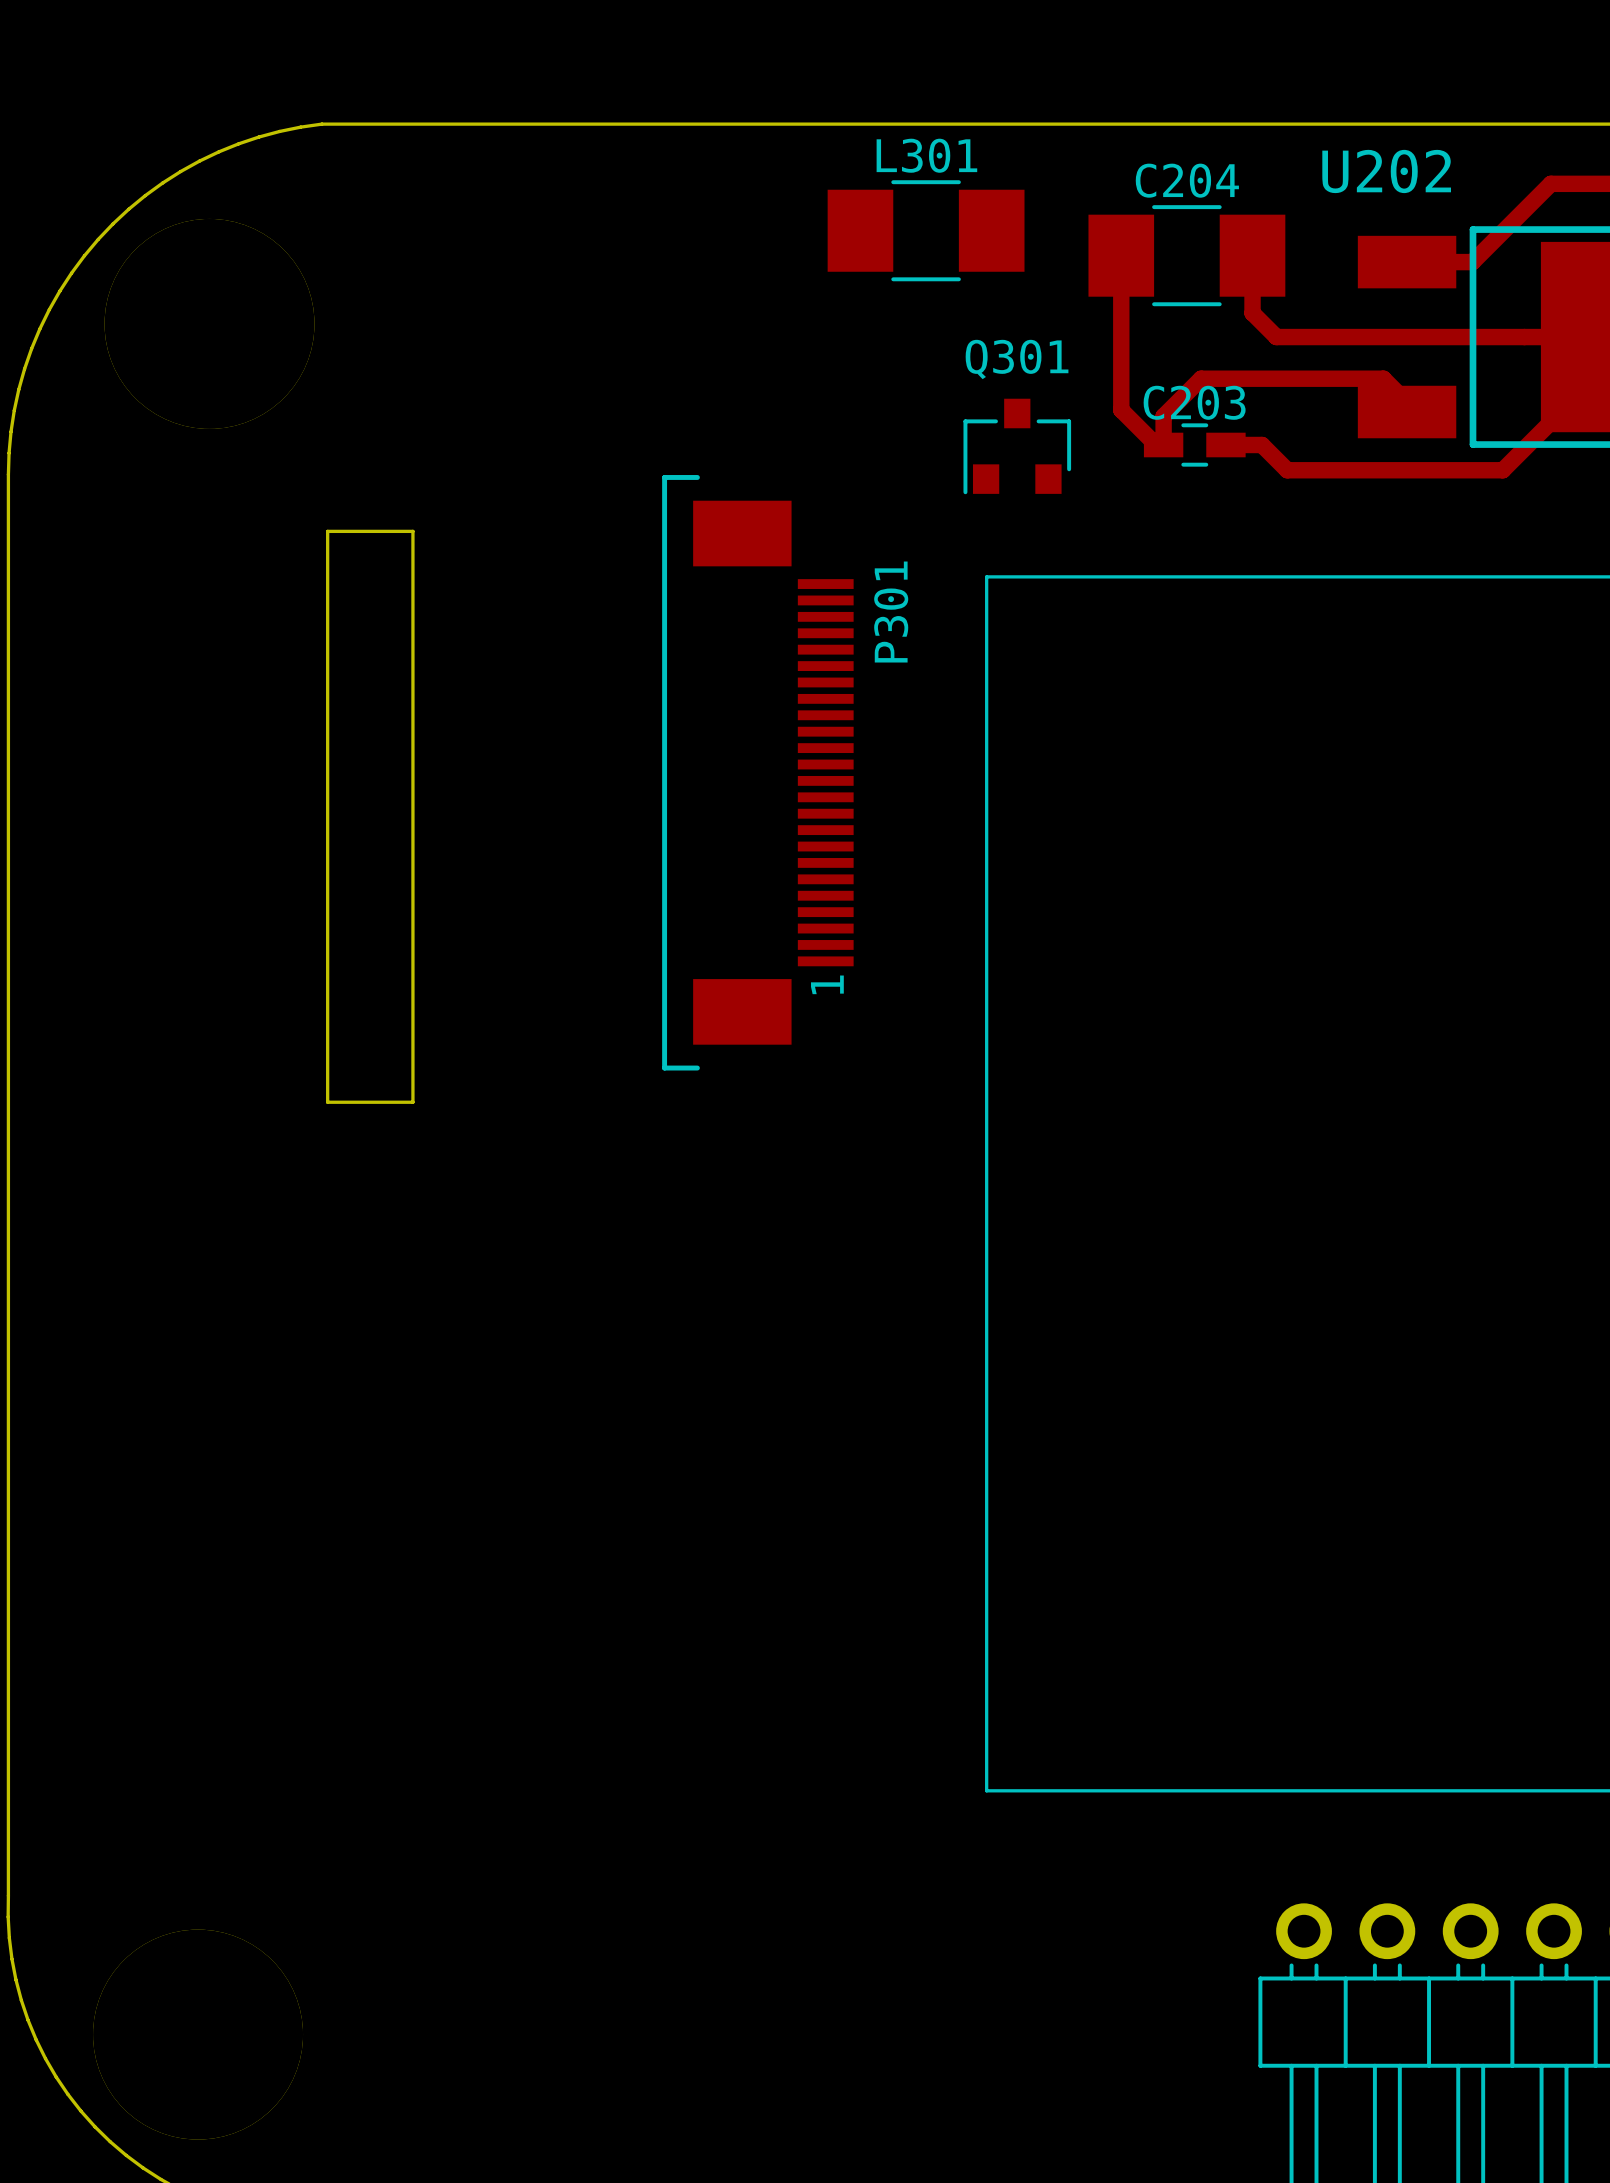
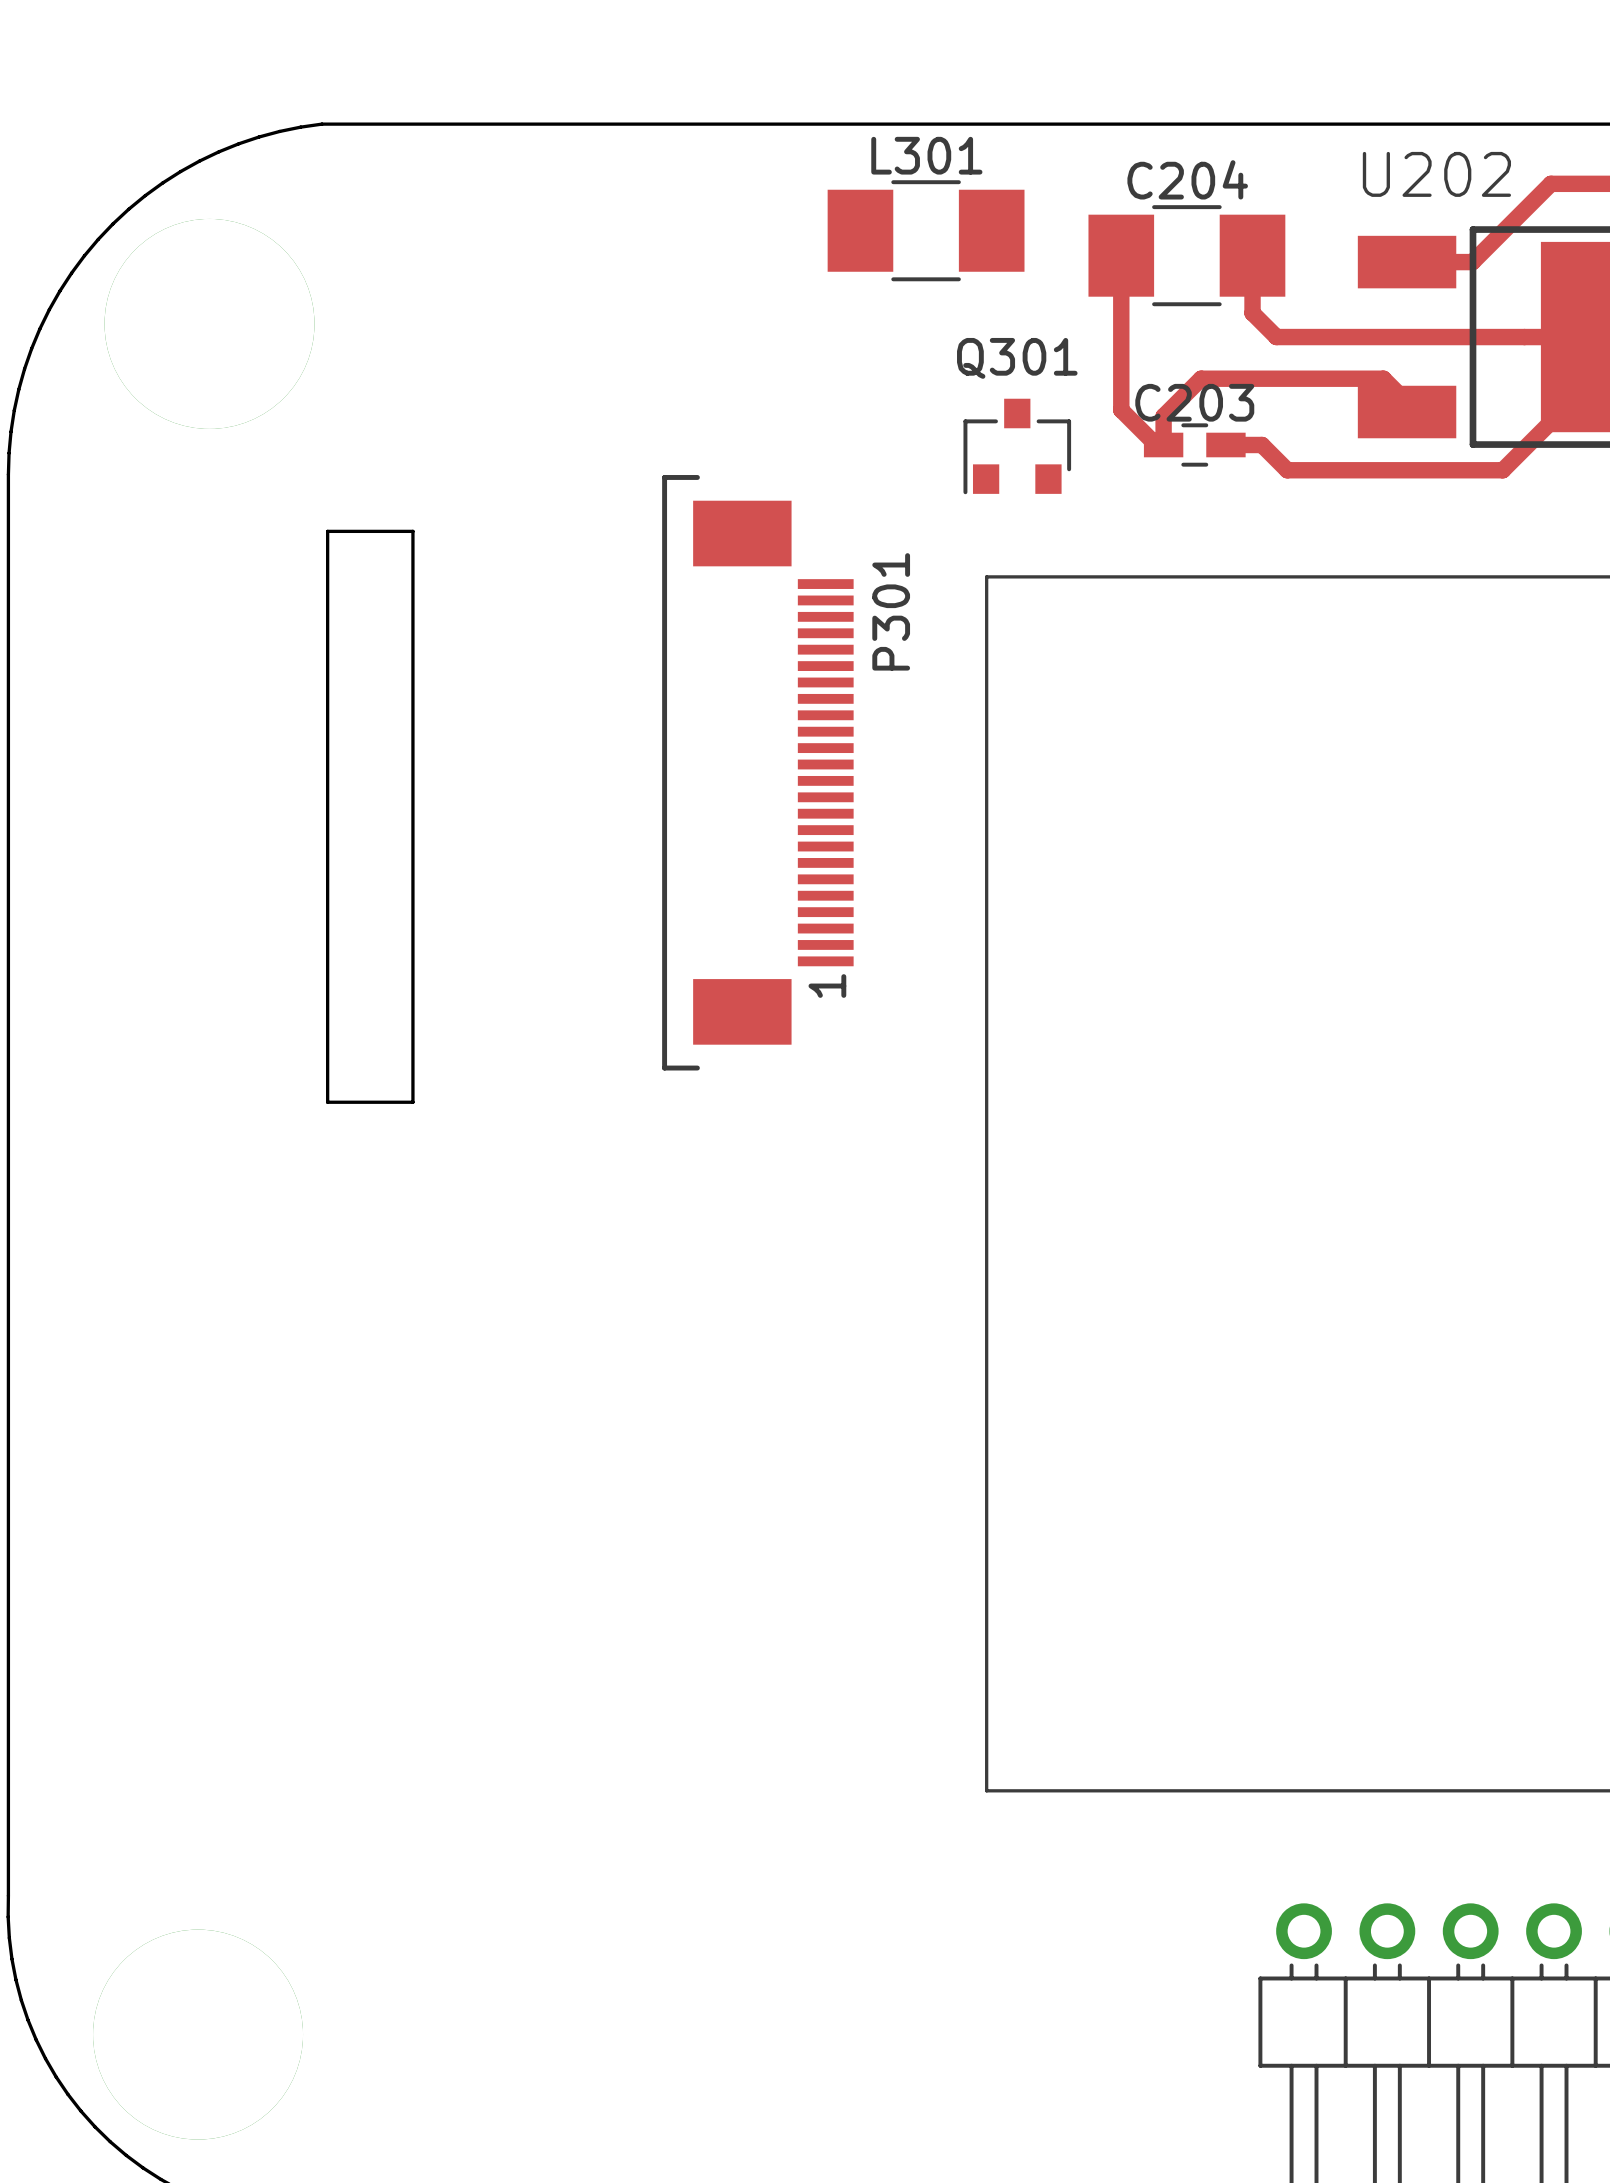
U202 name position: U202 (1386, 171) -> U202 (1436, 174)

